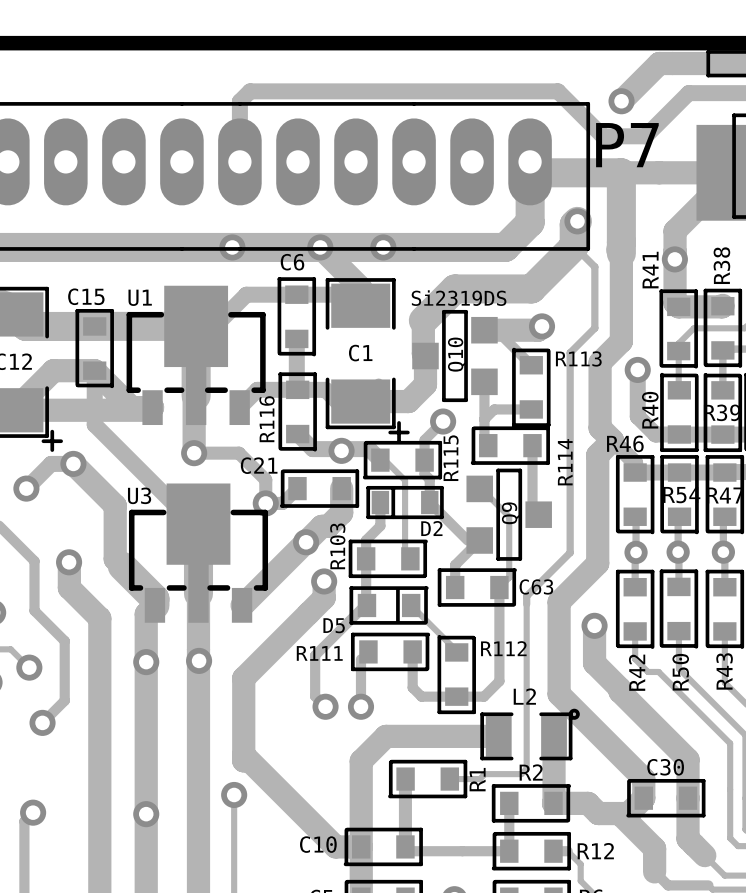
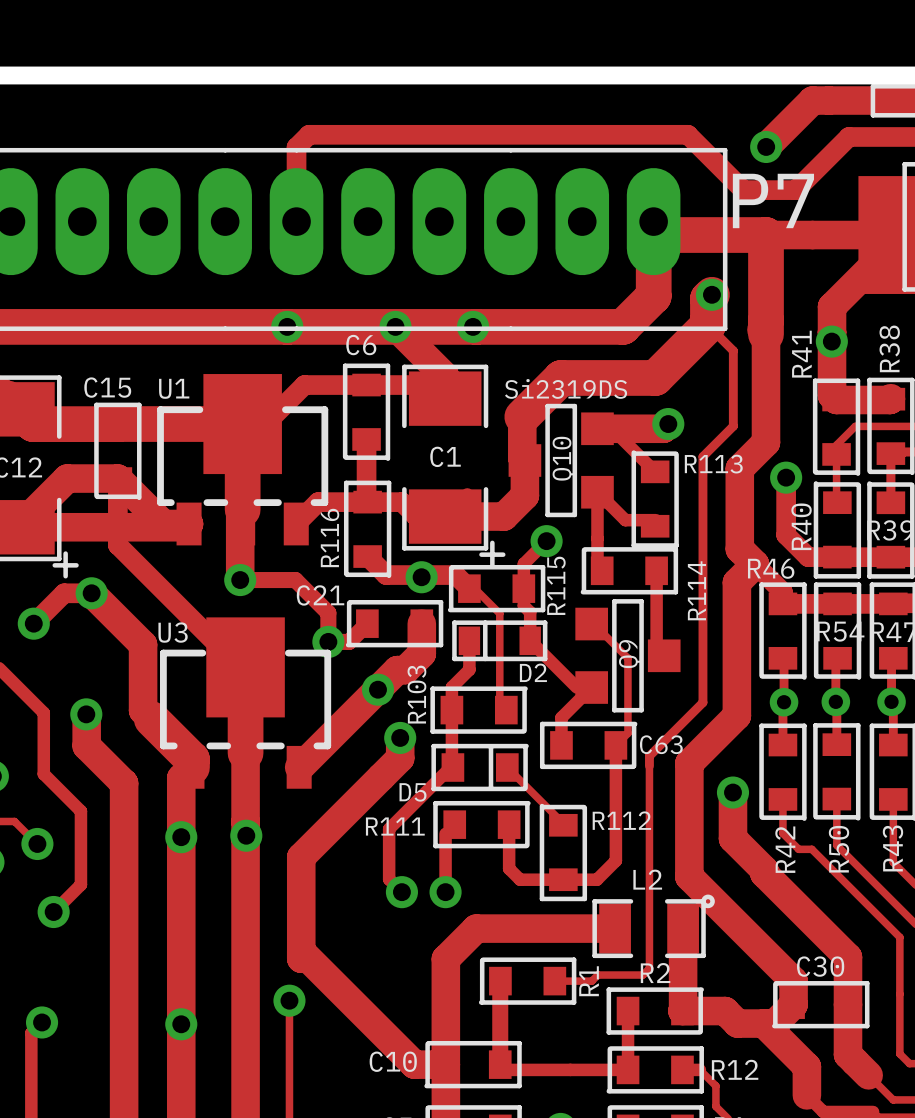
track: none -> (597, 492) (625, 520) (655, 520)
track: (531, 409) (494, 409) (484, 419) -> none

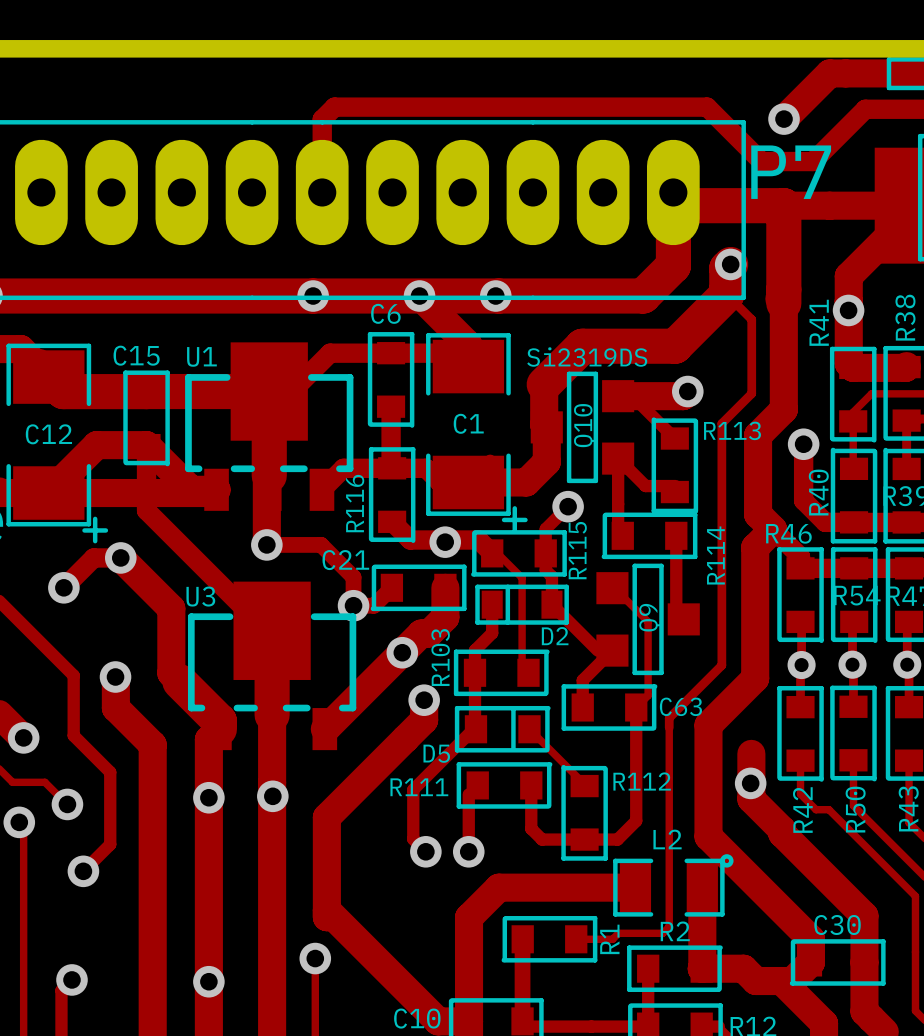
via position: (732, 792) -> (750, 783)

